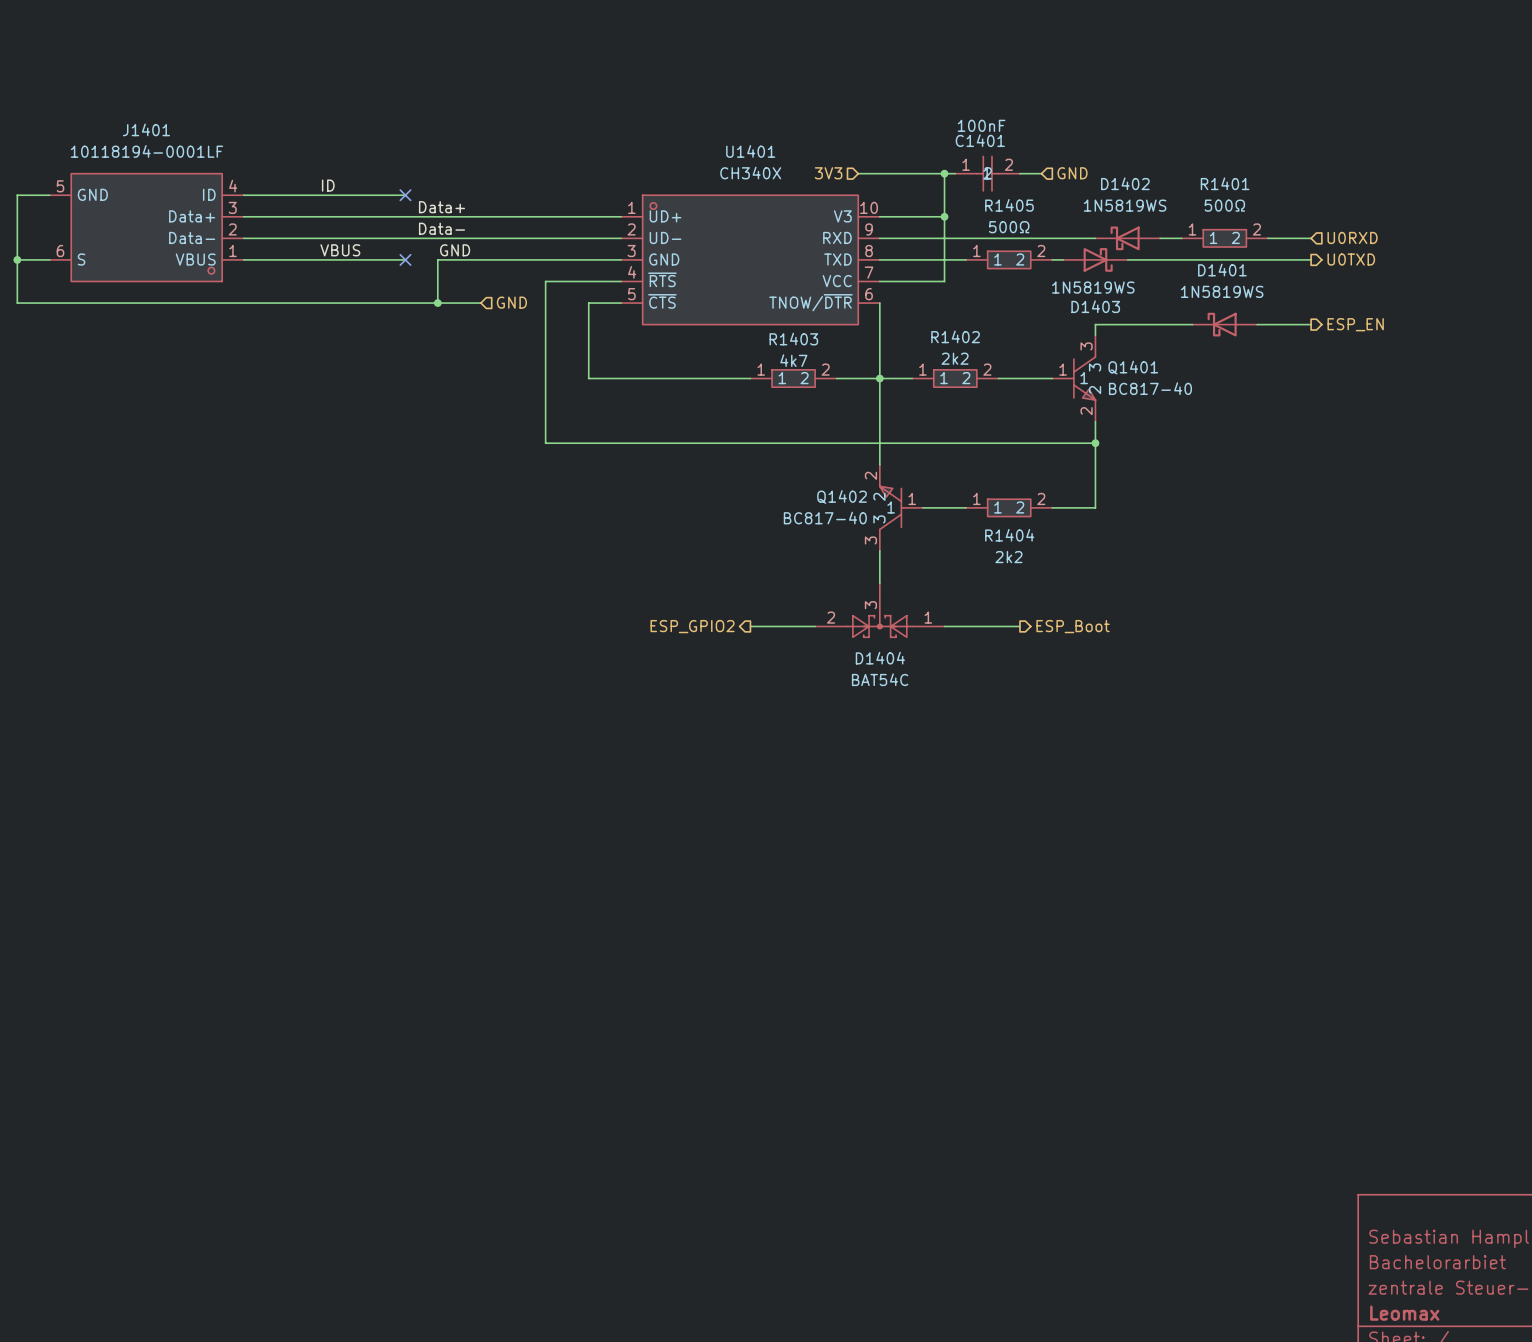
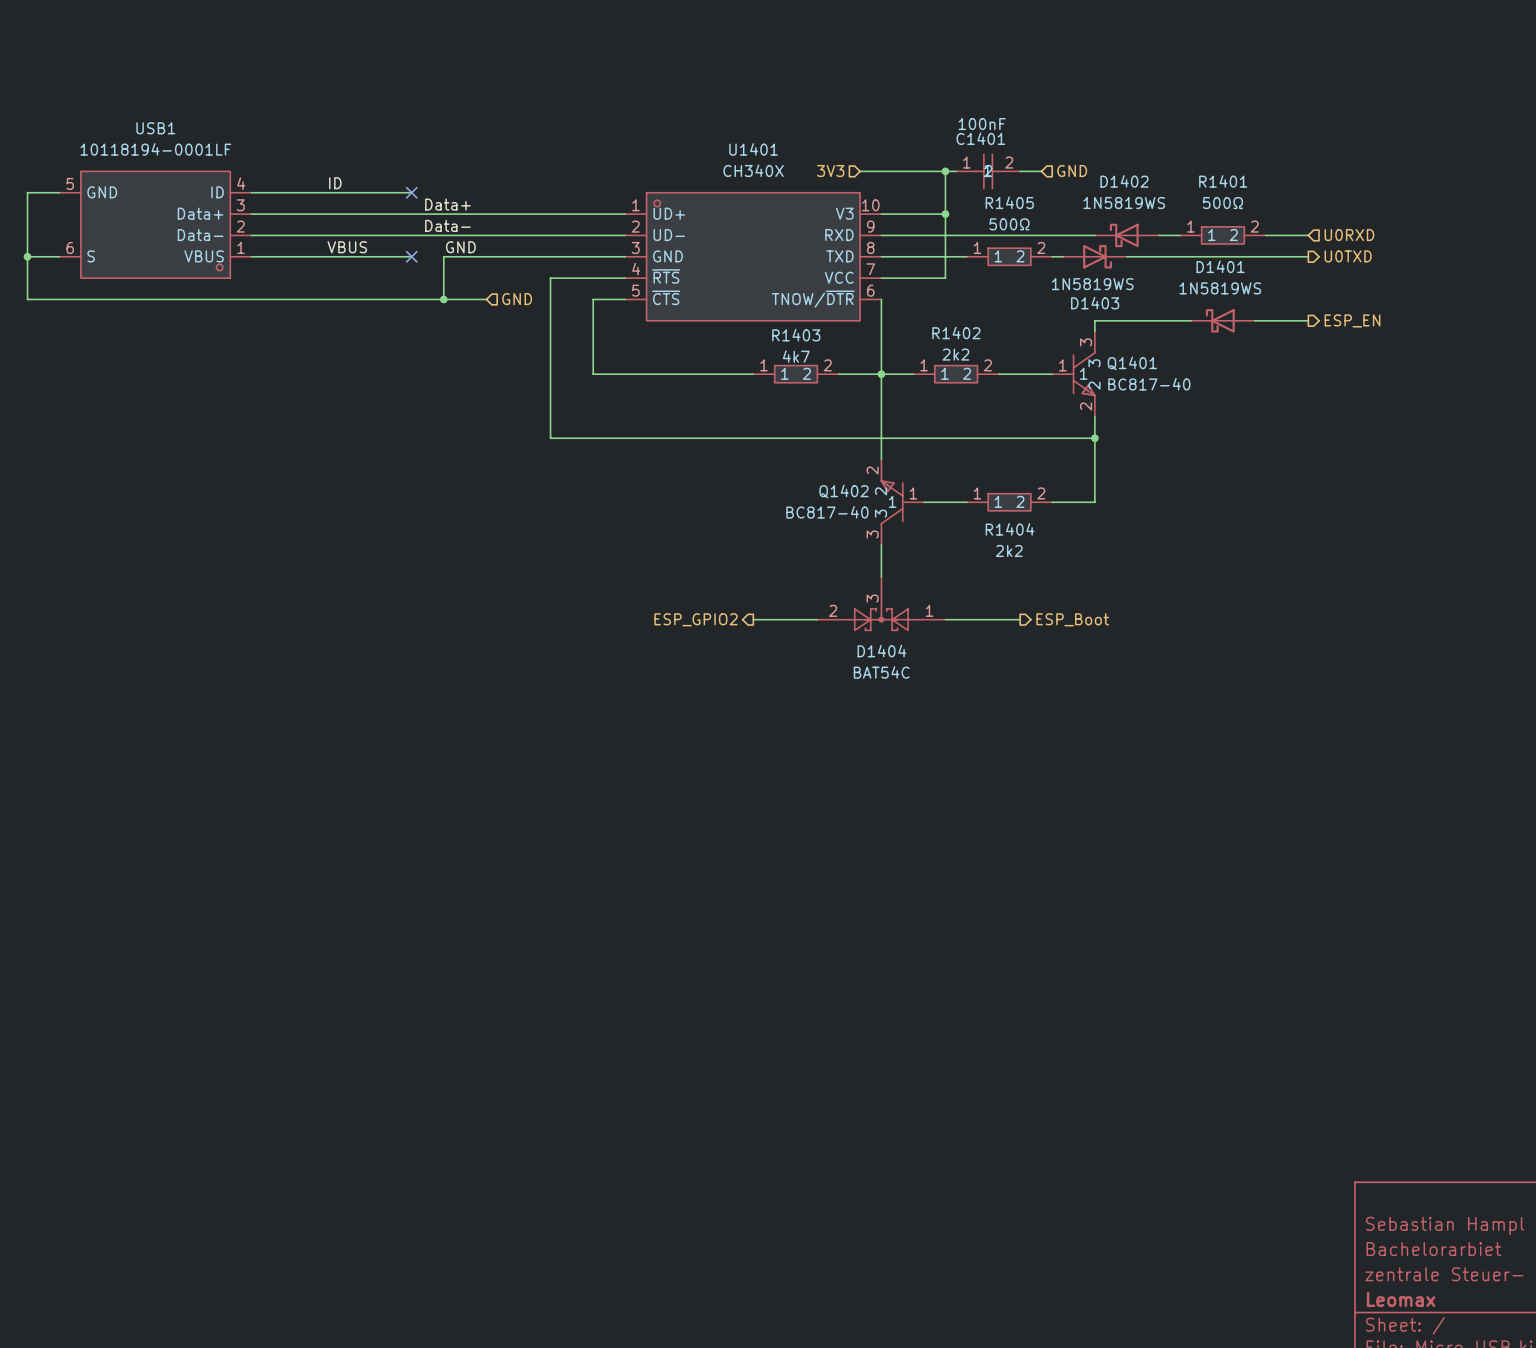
J1401 name: J1401 (146, 129) -> USB1 (155, 128)

